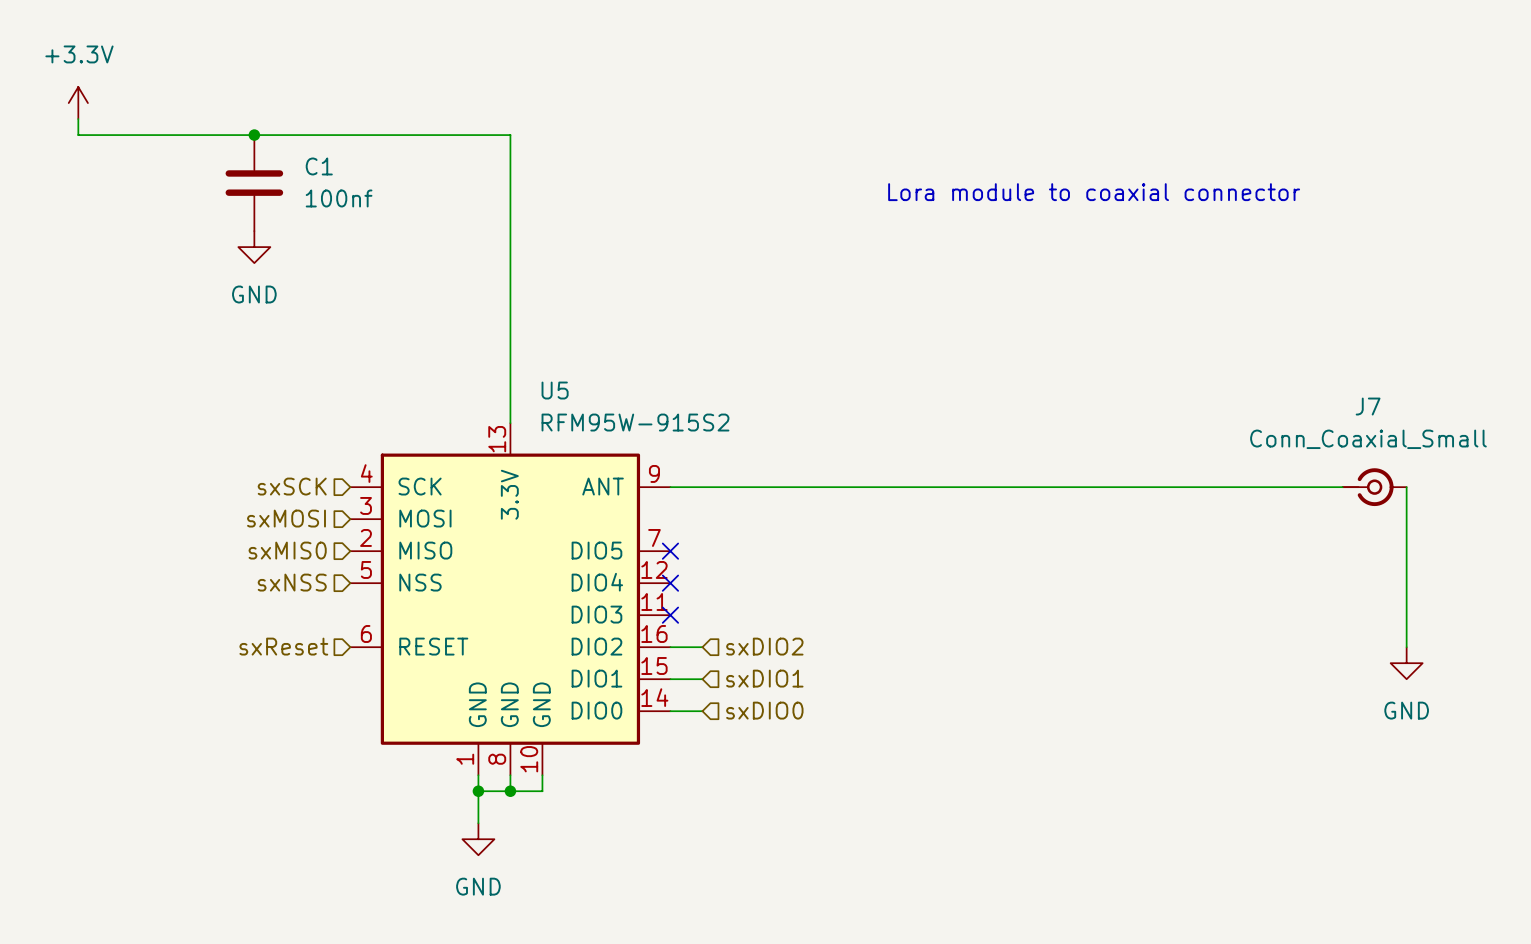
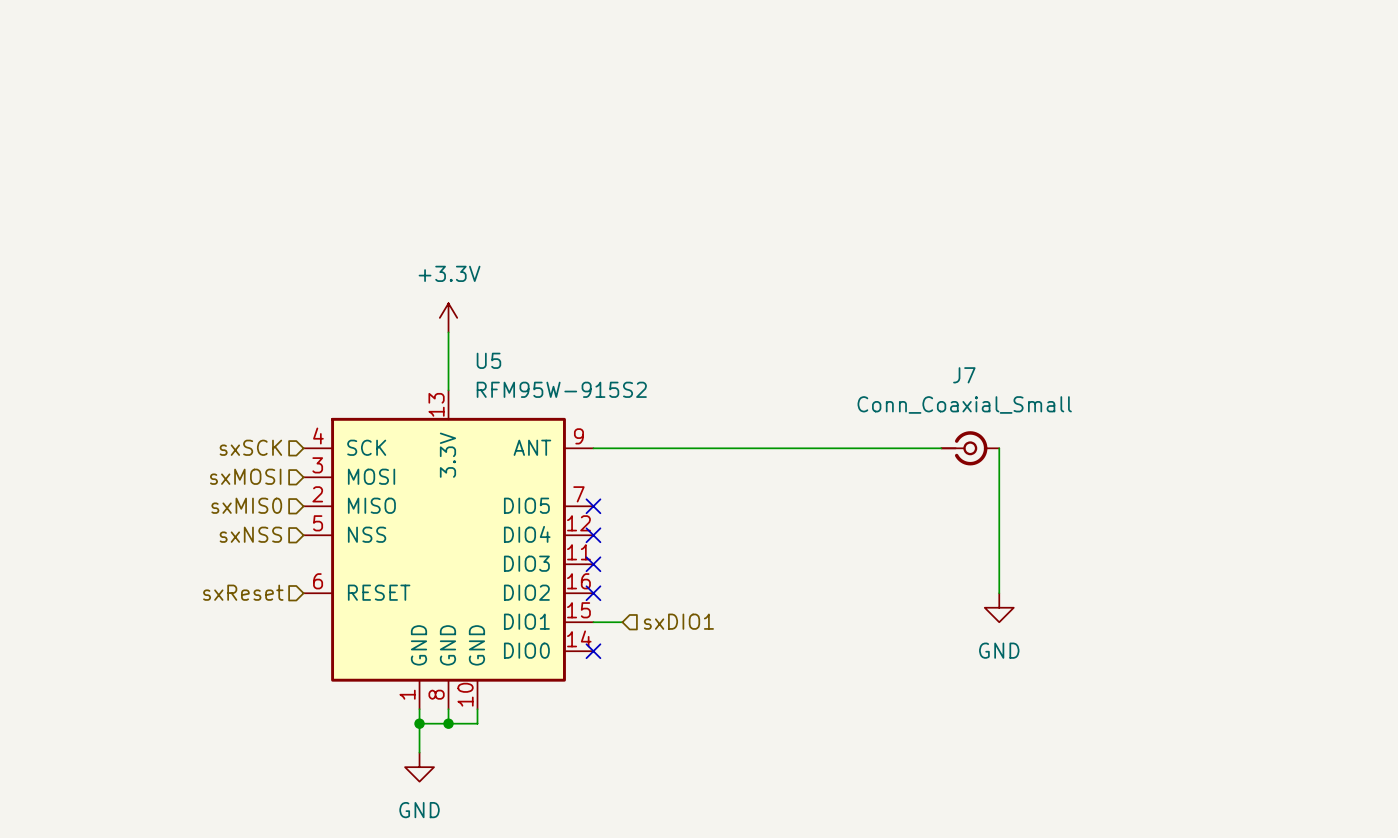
power symbol: +3.3V (78, 103) -> none
wire: (78, 119) (78, 135) (510, 135) (510, 359) -> none
junction: (254, 135) -> none
C1: 100nf (254, 183) -> none
text: Lora module to coaxial connector (1094, 192) -> none
power symbol: GND (254, 247) -> none
power symbol: none -> +3.3V (448, 317)
wire: (1054, 487) (1342, 487) -> none
J7 position: (1374, 487) -> (970, 448)
wire: (1406, 487) (1406, 647) -> (999, 448) (999, 593)
hierarchical label: sxDIO2 (764, 646) -> none
wire: (670, 647) (702, 647) -> none
no-connect mark: none -> (593, 593)
power symbol position: GND (1406, 663) -> GND (999, 607)
hierarchical label: sxDIO0 (764, 710) -> none
wire: (670, 711) (702, 711) -> none
no-connect mark: none -> (593, 651)

